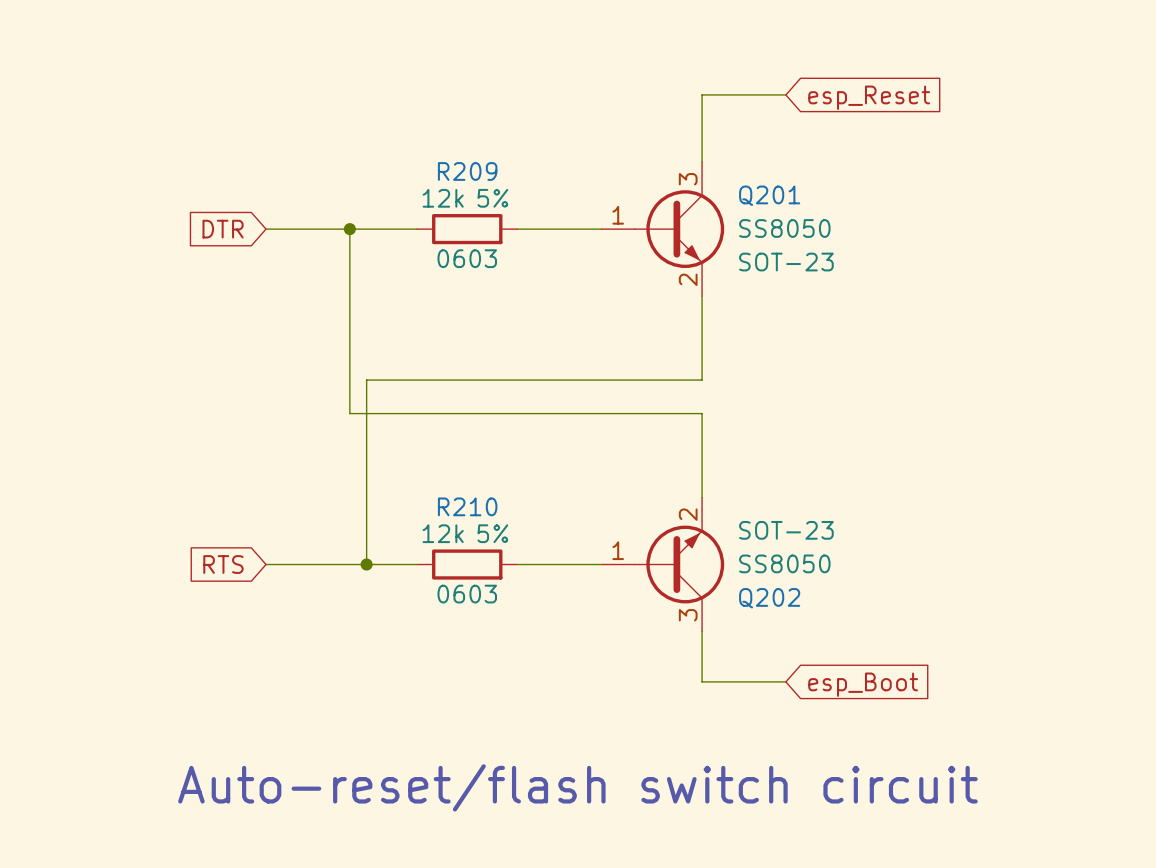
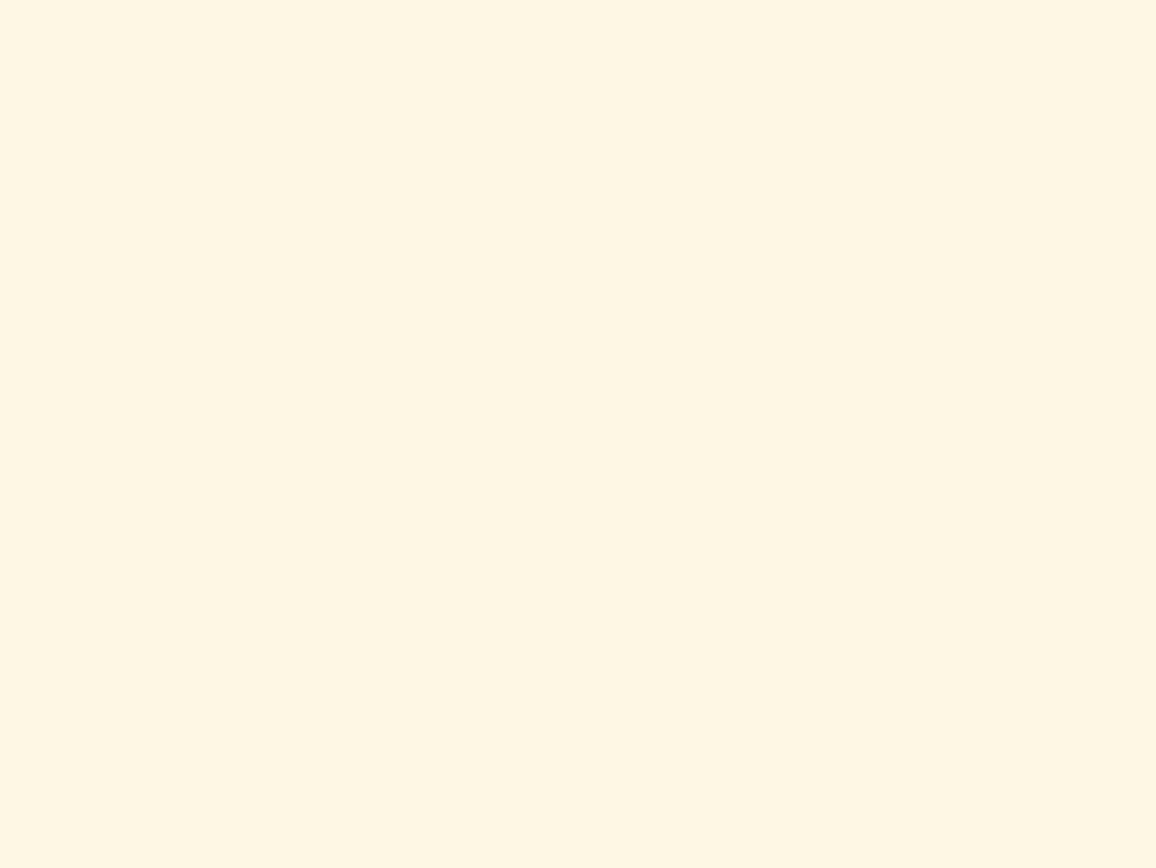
wire: (785, 94) (702, 94) (702, 162) -> none
global label: esp_Reset (869, 97) -> none
global label: DTR (223, 229) -> none
wire: (266, 229) (416, 229) -> none
wire: (349, 229) (349, 413) (702, 413) (702, 497) -> none
junction: (349, 229) -> none
R209: 12k (467, 229) -> none
wire: (517, 229) (601, 229) -> none
Q201: SS8050 (662, 229) -> none
wire: (702, 296) (702, 380) (366, 380) (366, 564) -> none
global label: RTS (223, 564) -> none
wire: (266, 564) (416, 564) -> none
junction: (366, 564) -> none
R210: 12k (467, 564) -> none
wire: (517, 564) (601, 564) -> none
Q202: SS8050 (662, 564) -> none
wire: (702, 631) (702, 681) (785, 681) -> none
global label: esp_Boot (863, 684) -> none
text: Auto-reset/flash switch circuit (577, 787) -> none

